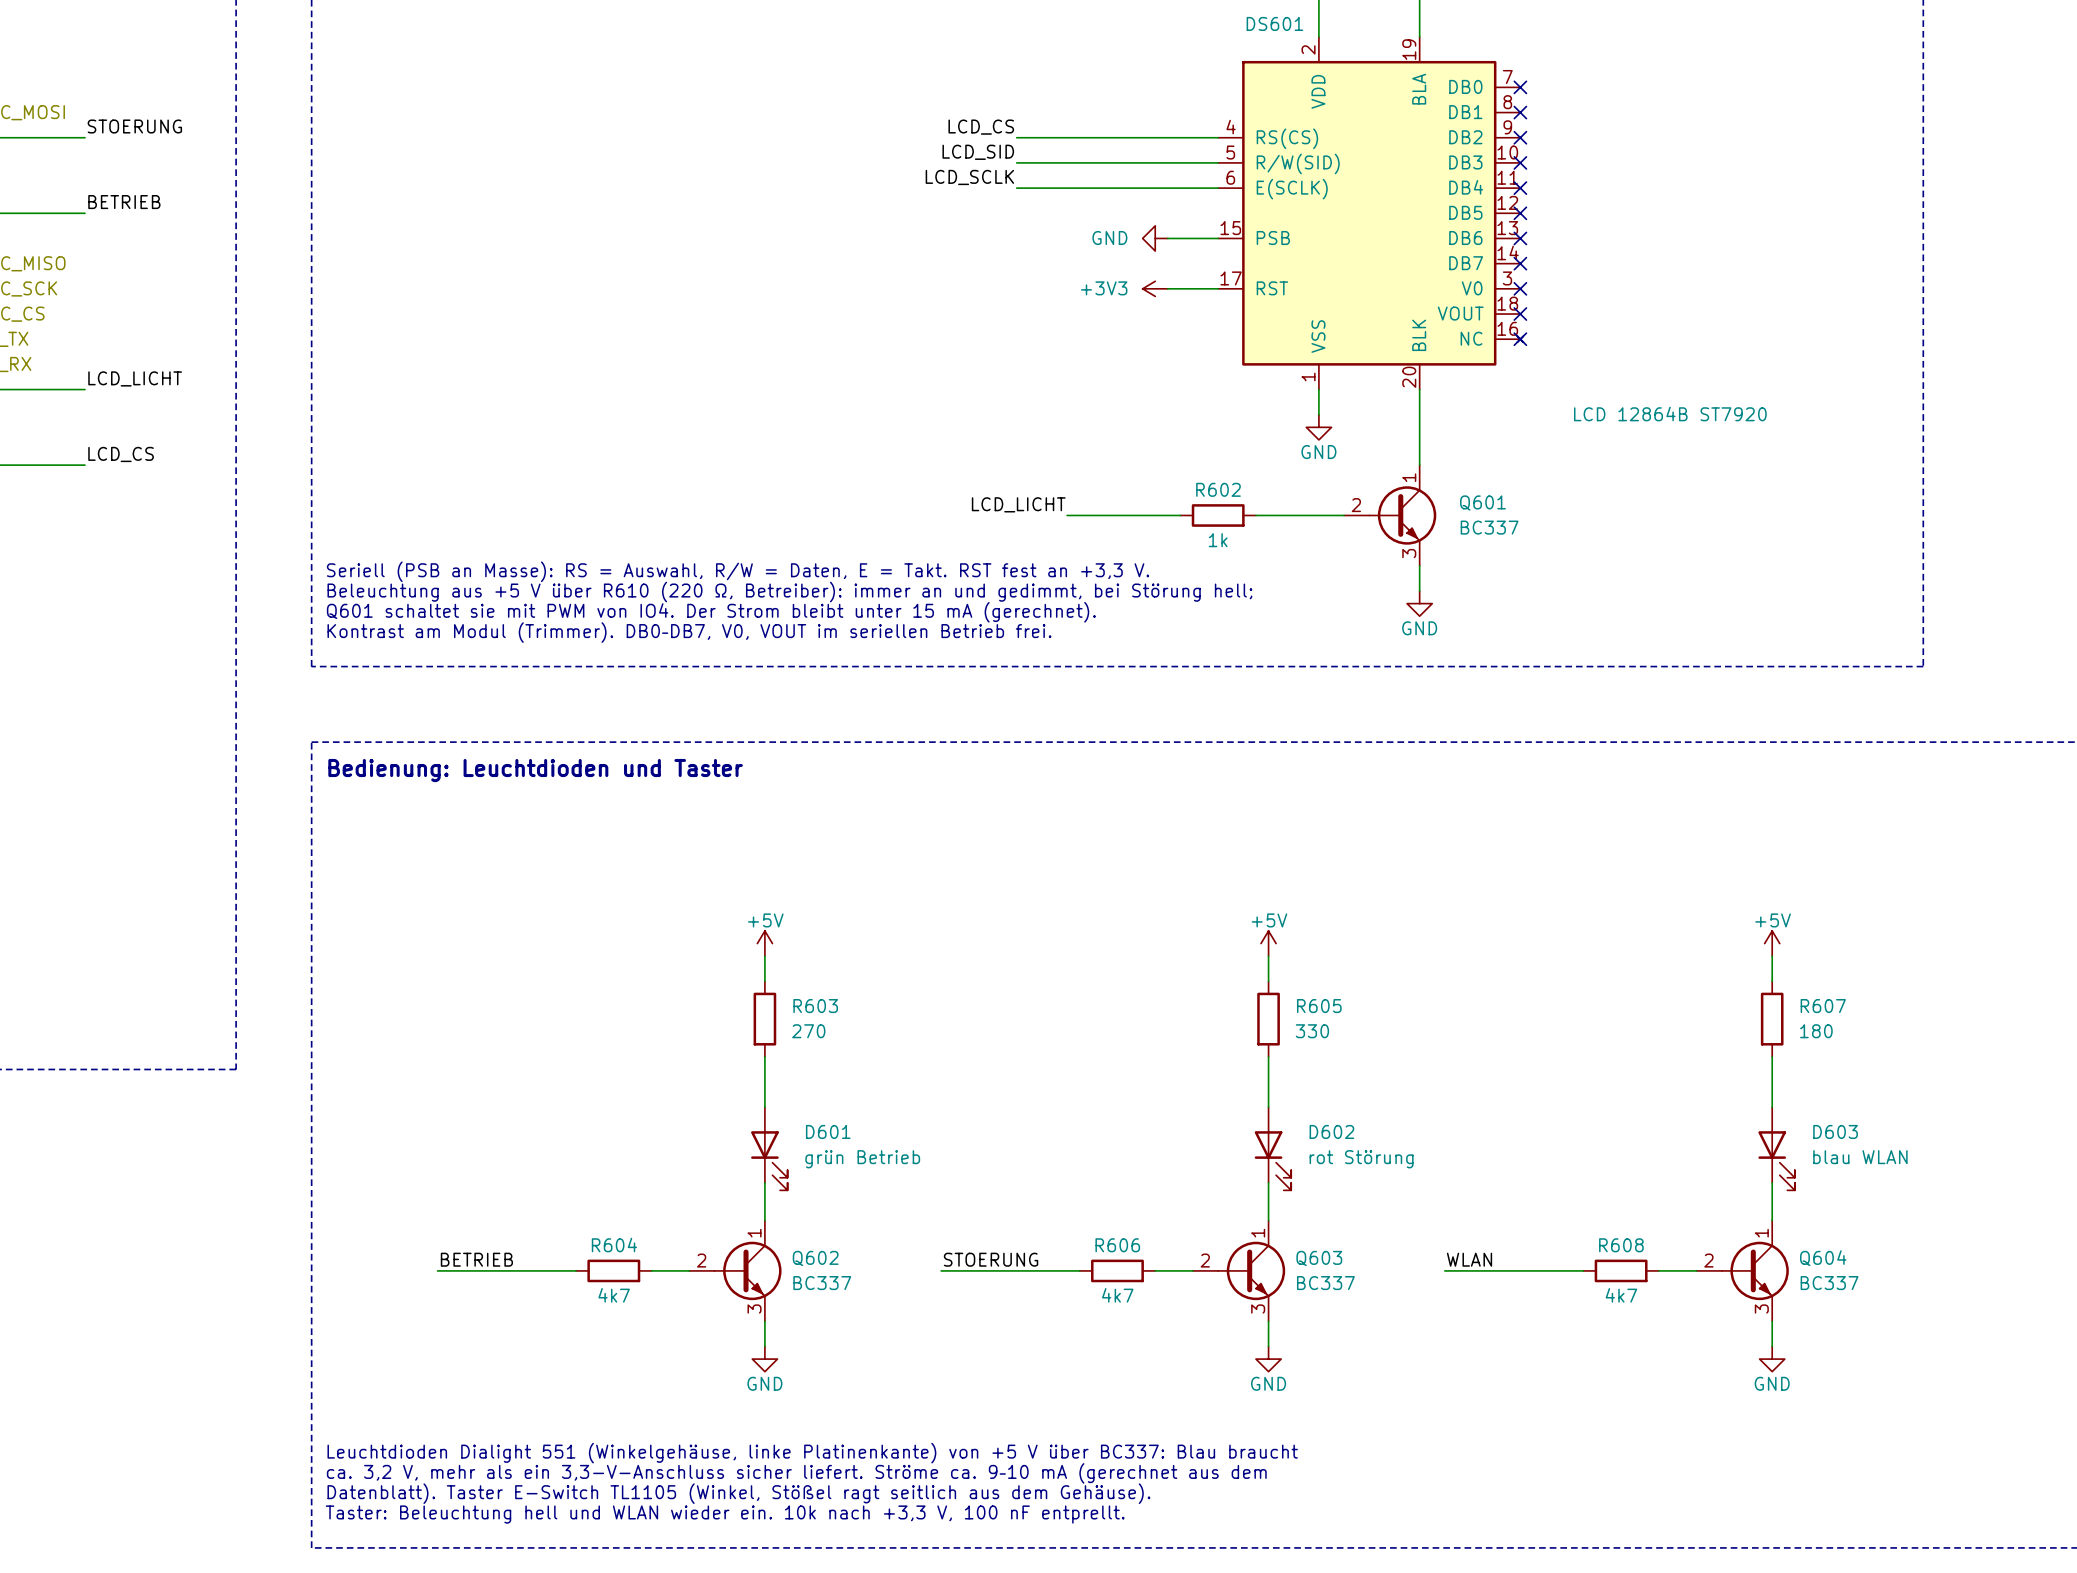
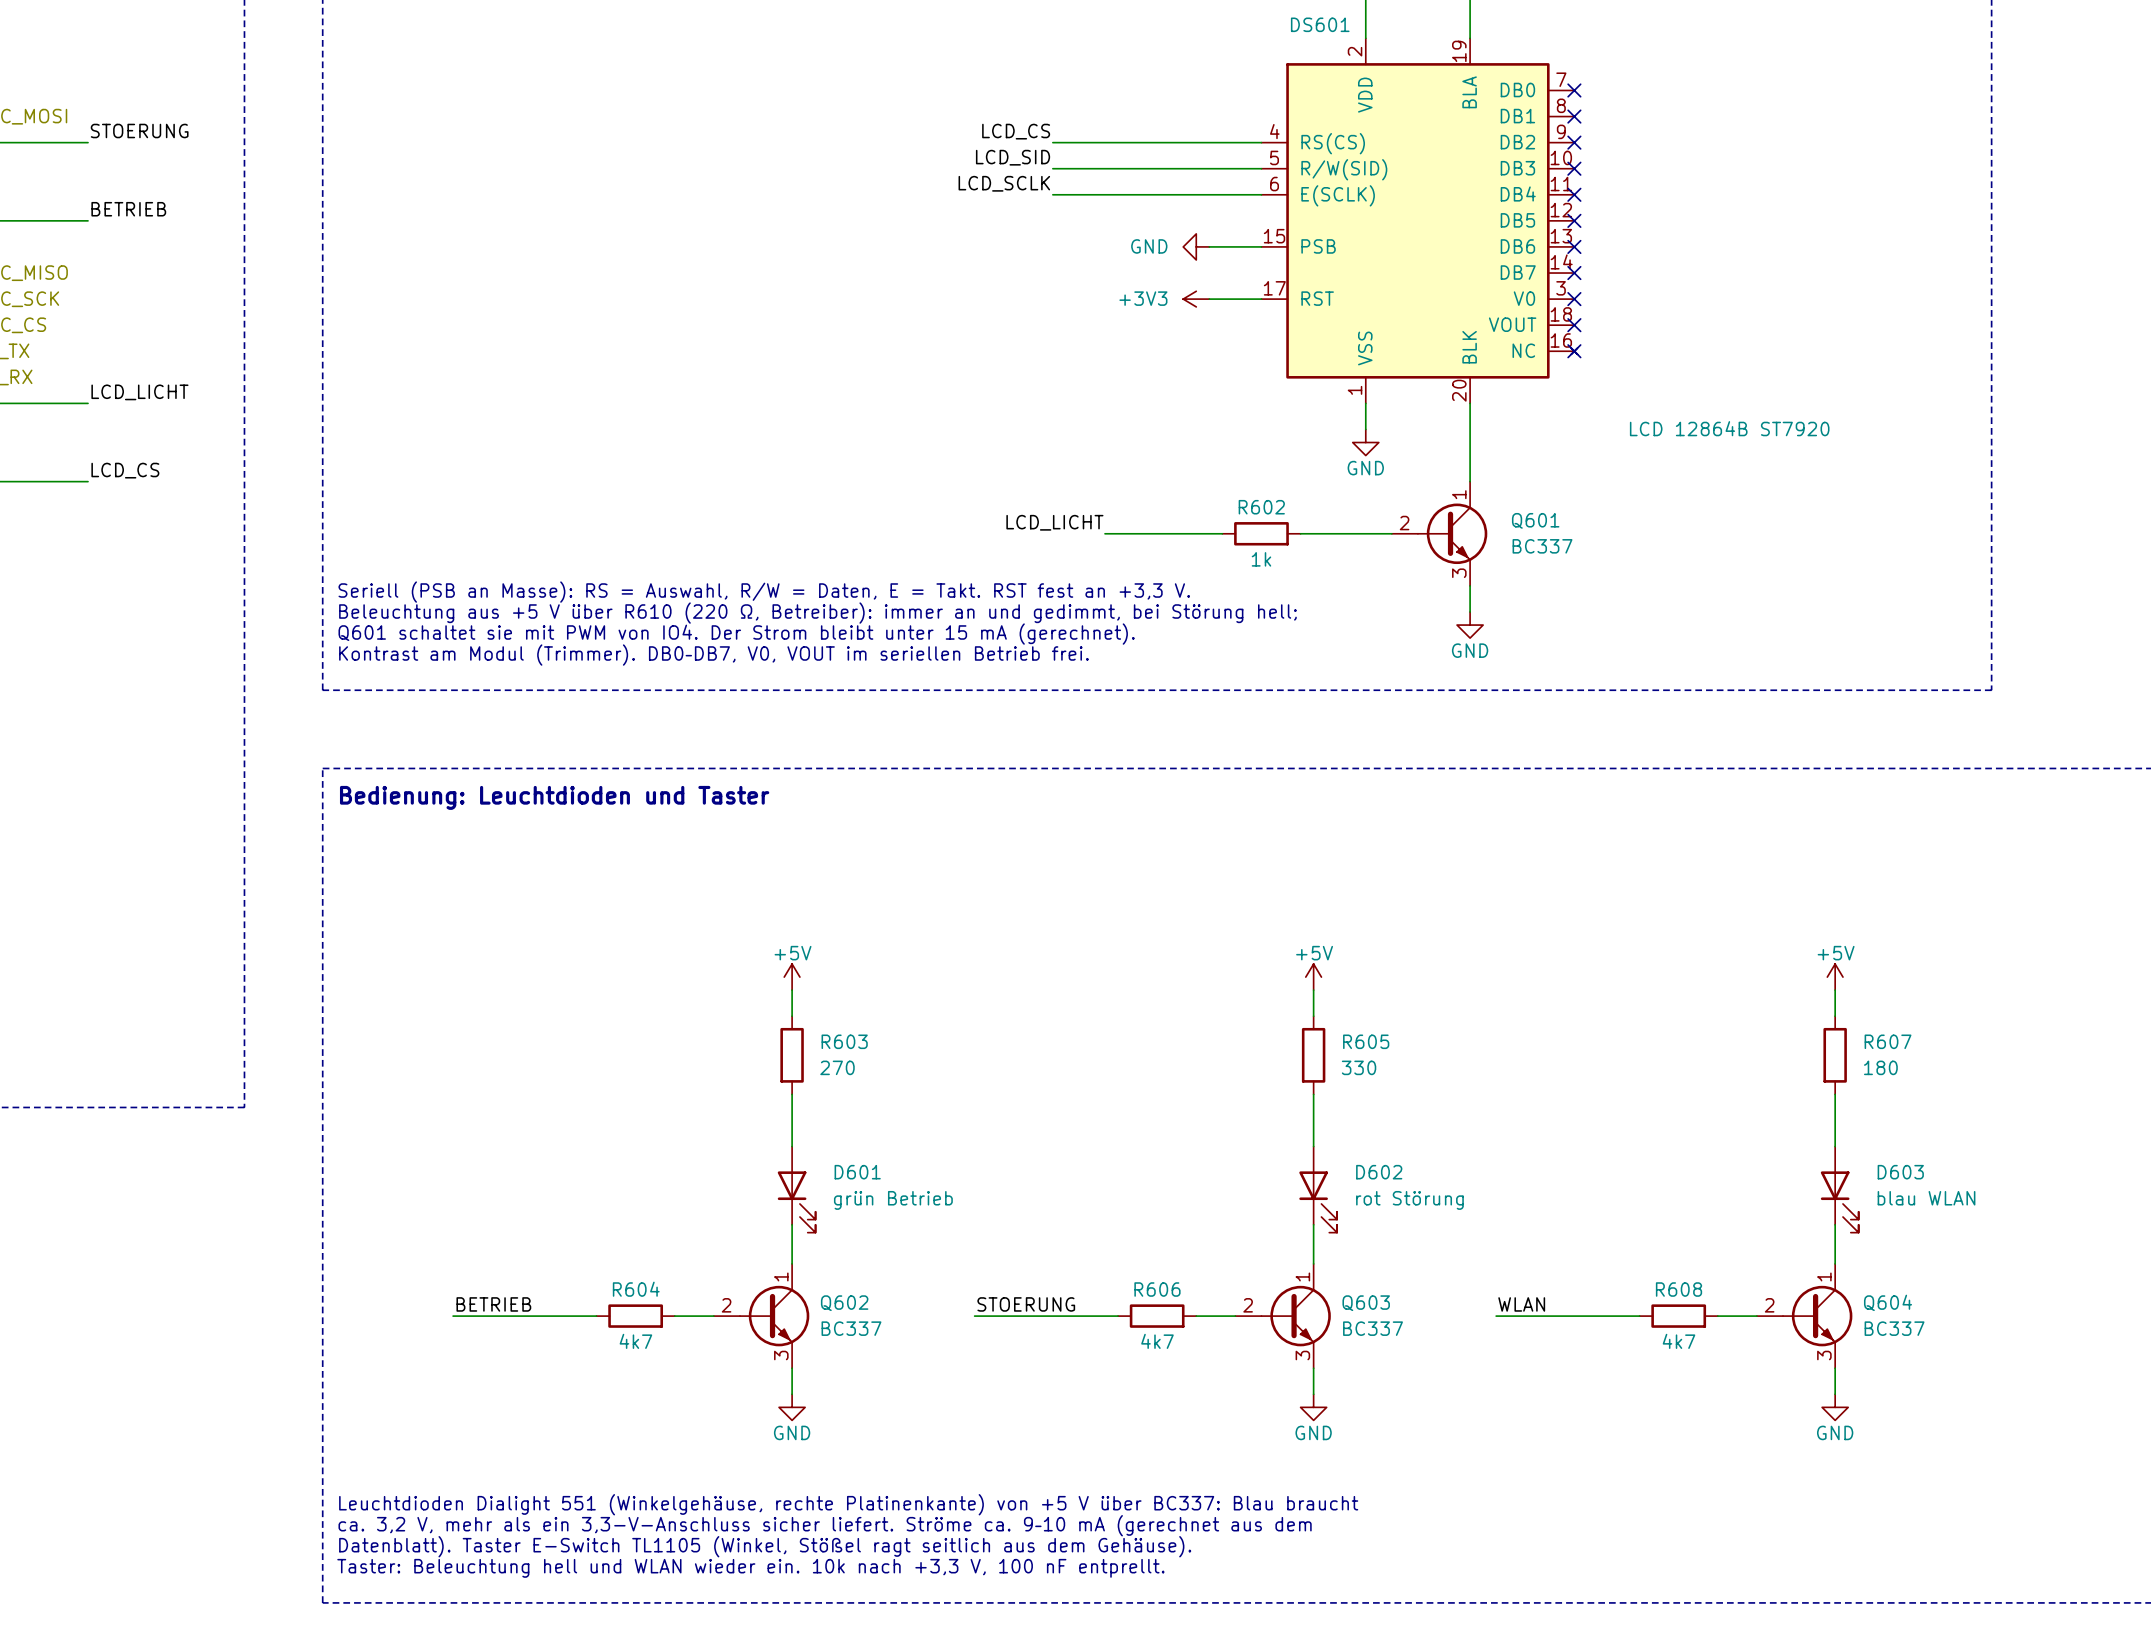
text: Leuchtdioden Dialight 551 (Winkelgehäuse, linke Platinenkante) von +5 V über BC337: Blau braucht (812, 1453) -> Leuchtdioden Dialight 551 (Winkelgehäuse, rechte Platinenkante) von +5 V über BC337: Blau braucht (848, 1504)

